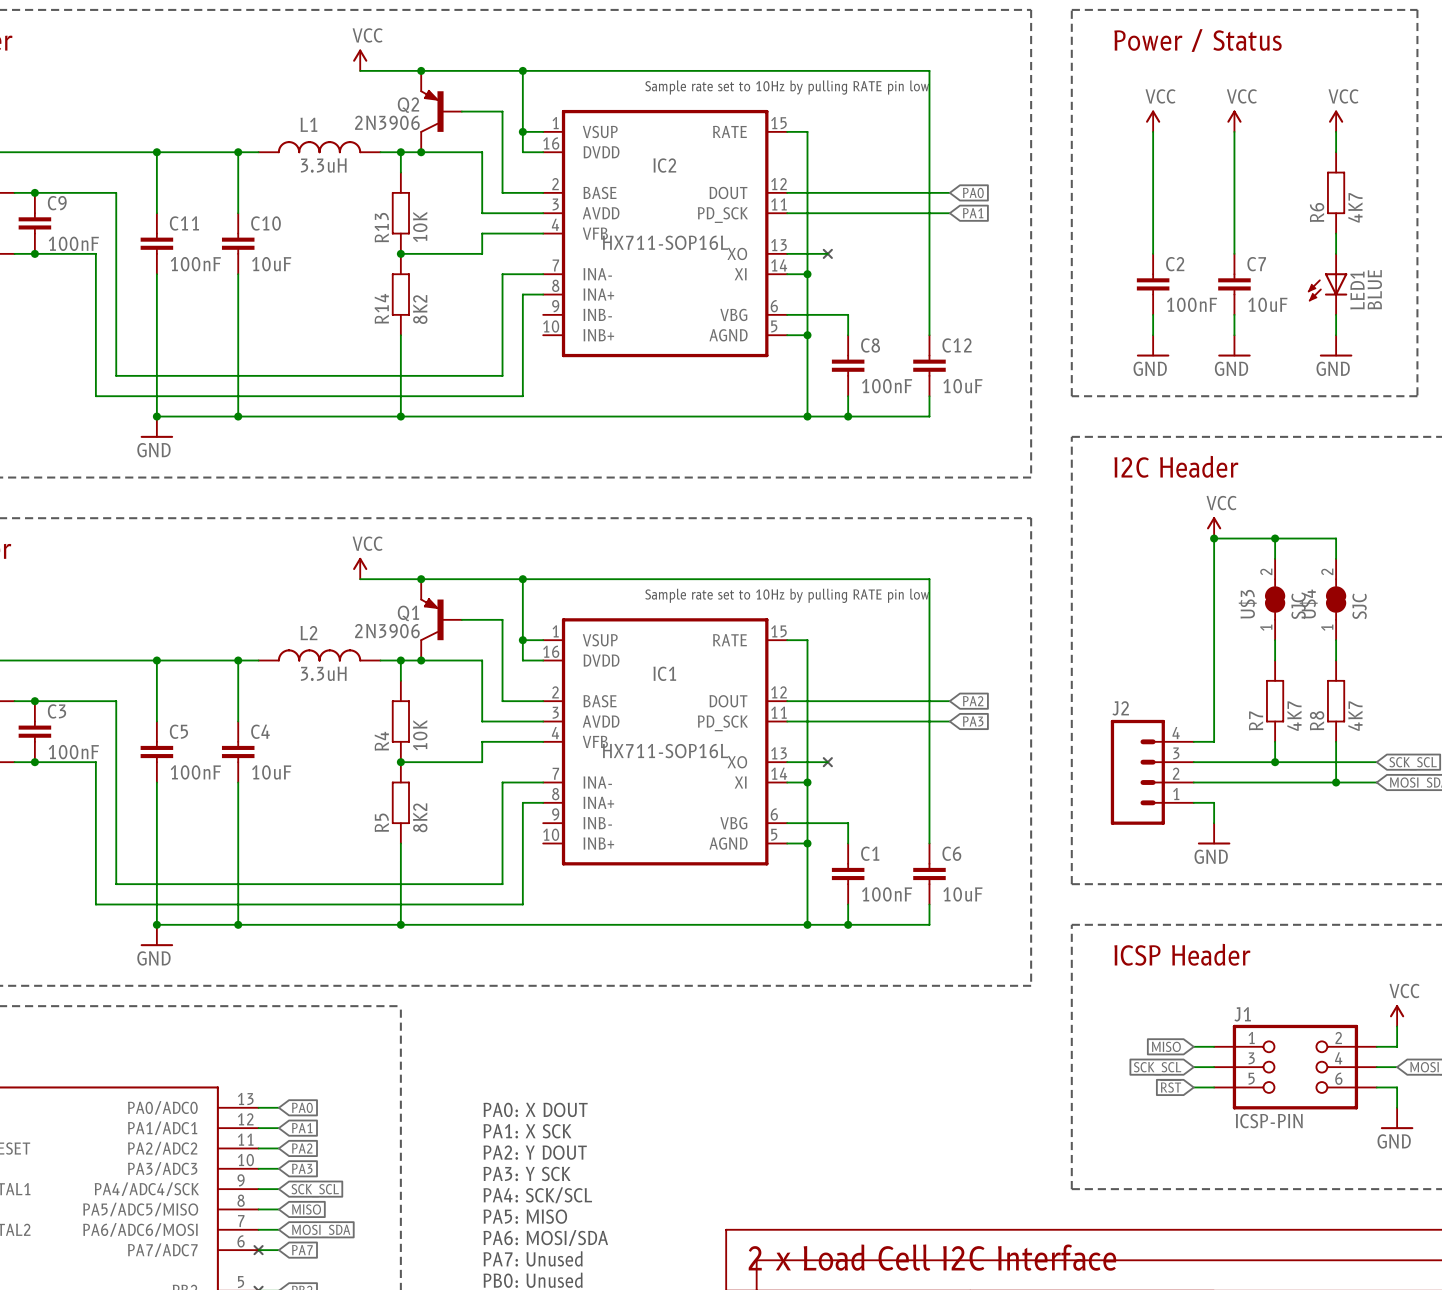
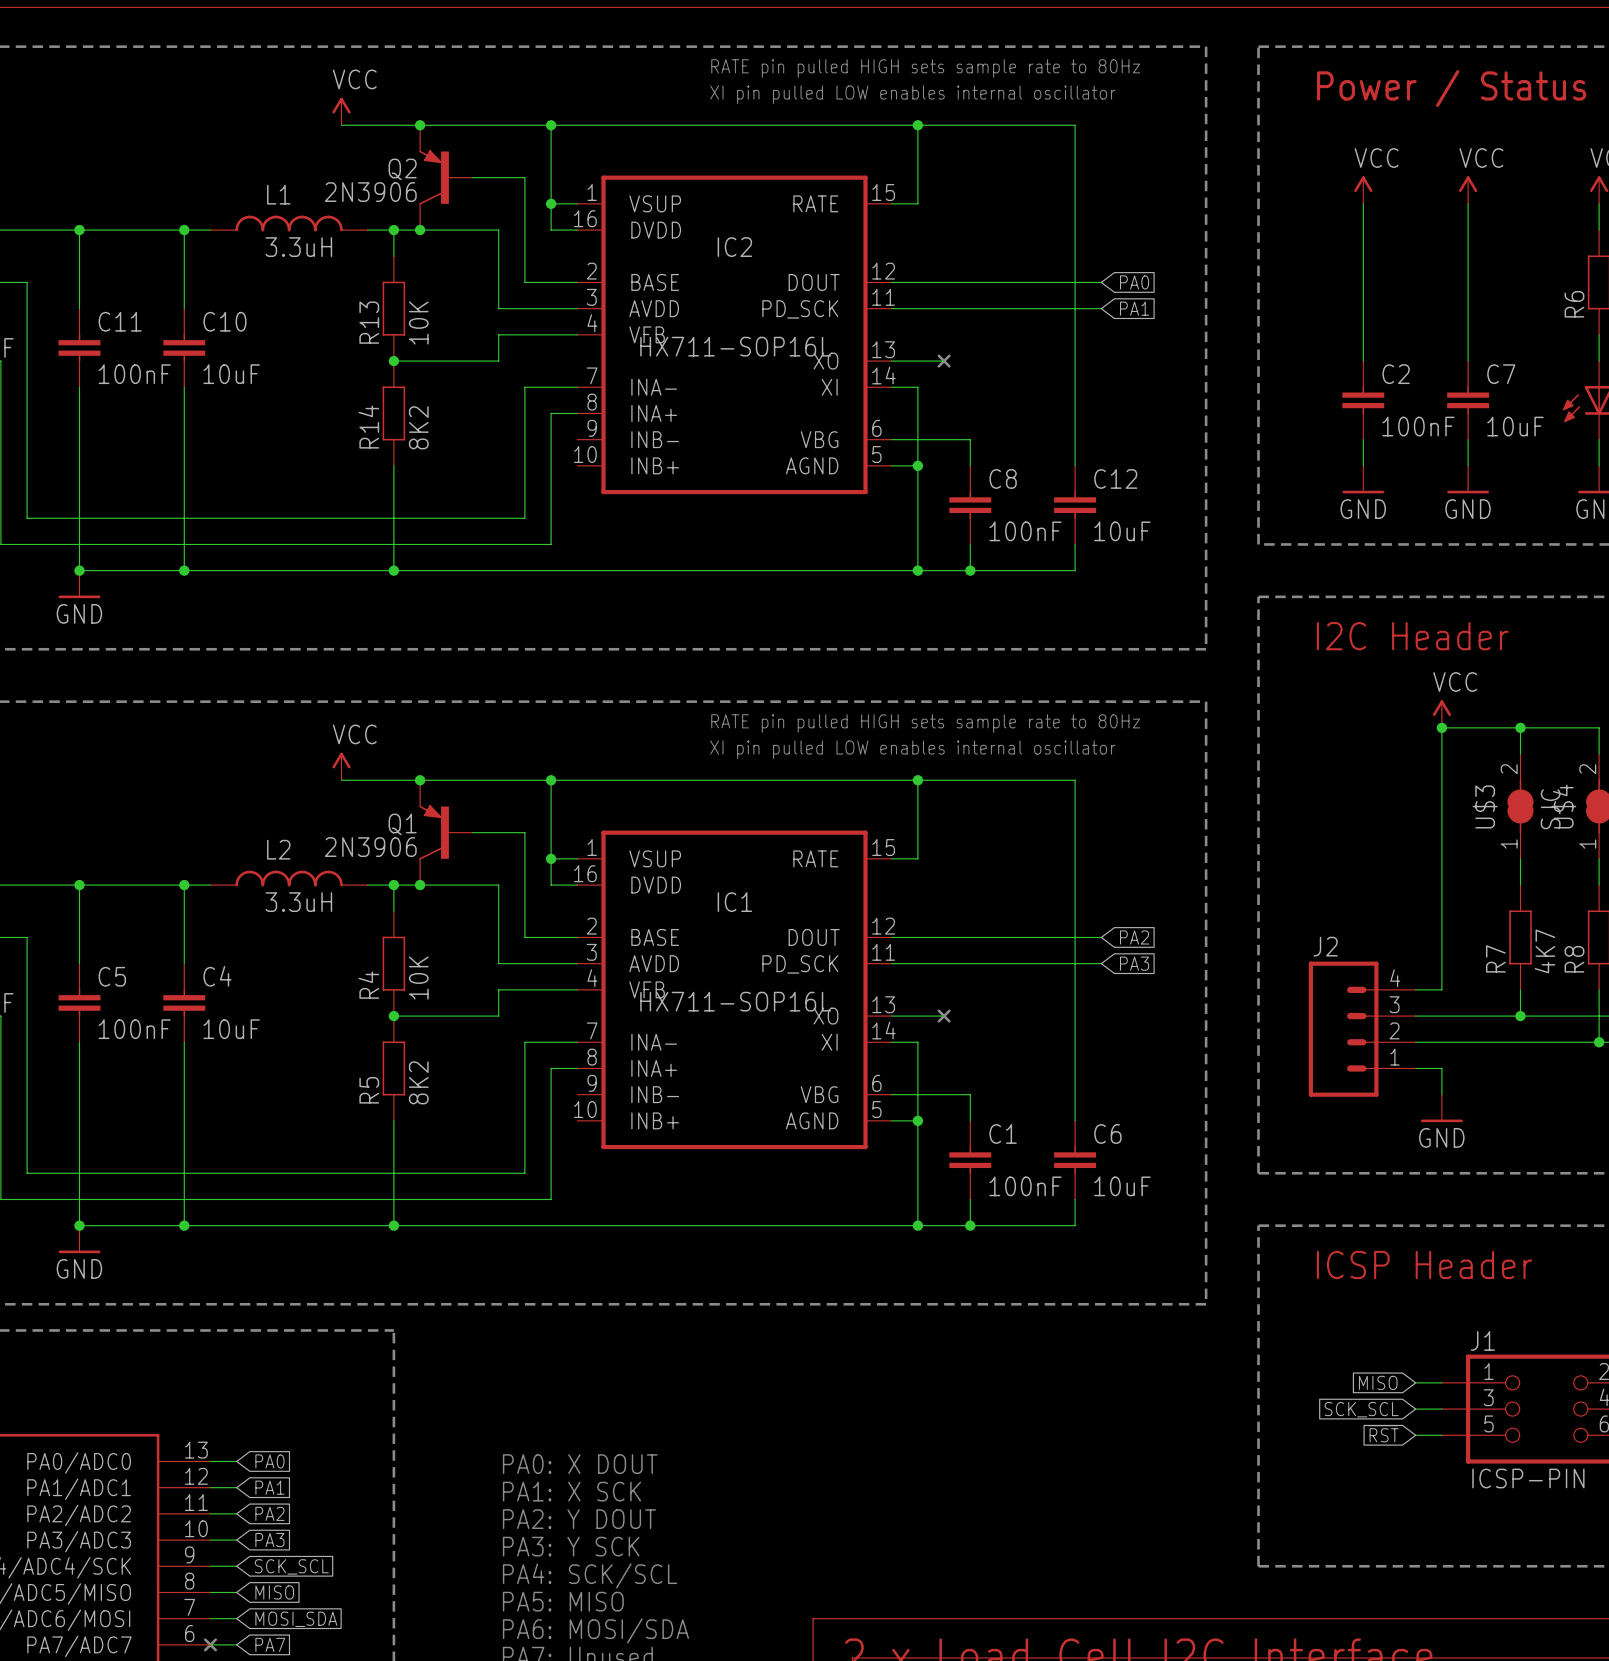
text: none -> RATE pin pulled HIGH sets sample rate to 80Hz (925, 68)
text: none -> XI pin pulled LOW enables internal oscillator (912, 94)
junction: none -> (917, 125)
text: Sample rate set to 10Hz by pulling RATE pin low (787, 87) -> none
wire: (807, 131) (807, 274) -> (917, 203) (917, 125)
junction: (807, 274) -> none
text: none -> RATE pin pulled HIGH sets sample rate to 80Hz (925, 723)
text: none -> XI pin pulled LOW enables internal oscillator (912, 749)
junction: none -> (917, 780)
text: Sample rate set to 10Hz by pulling RATE pin low (787, 595) -> none
wire: (807, 640) (807, 782) -> (917, 858) (917, 780)
junction: (807, 782) -> none

